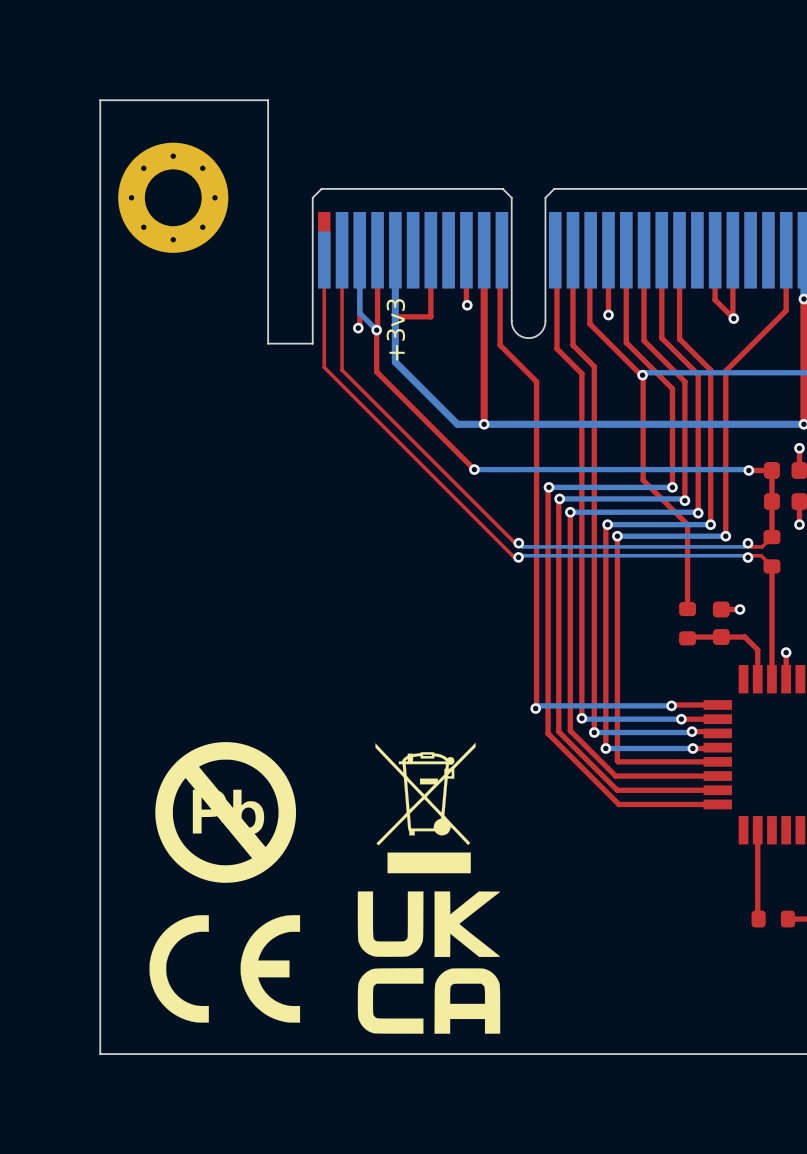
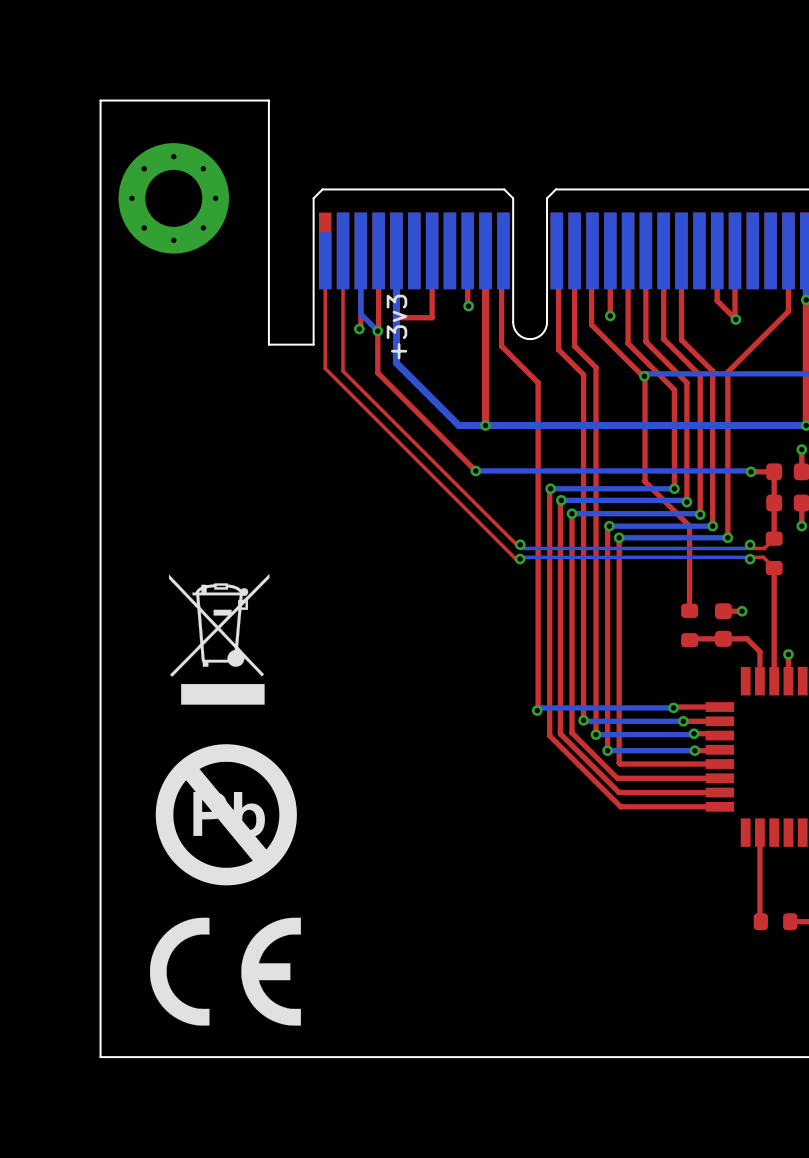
drawing position: (425, 808) -> (219, 639)
drawing: [357, 891, 501, 1034] -> none

